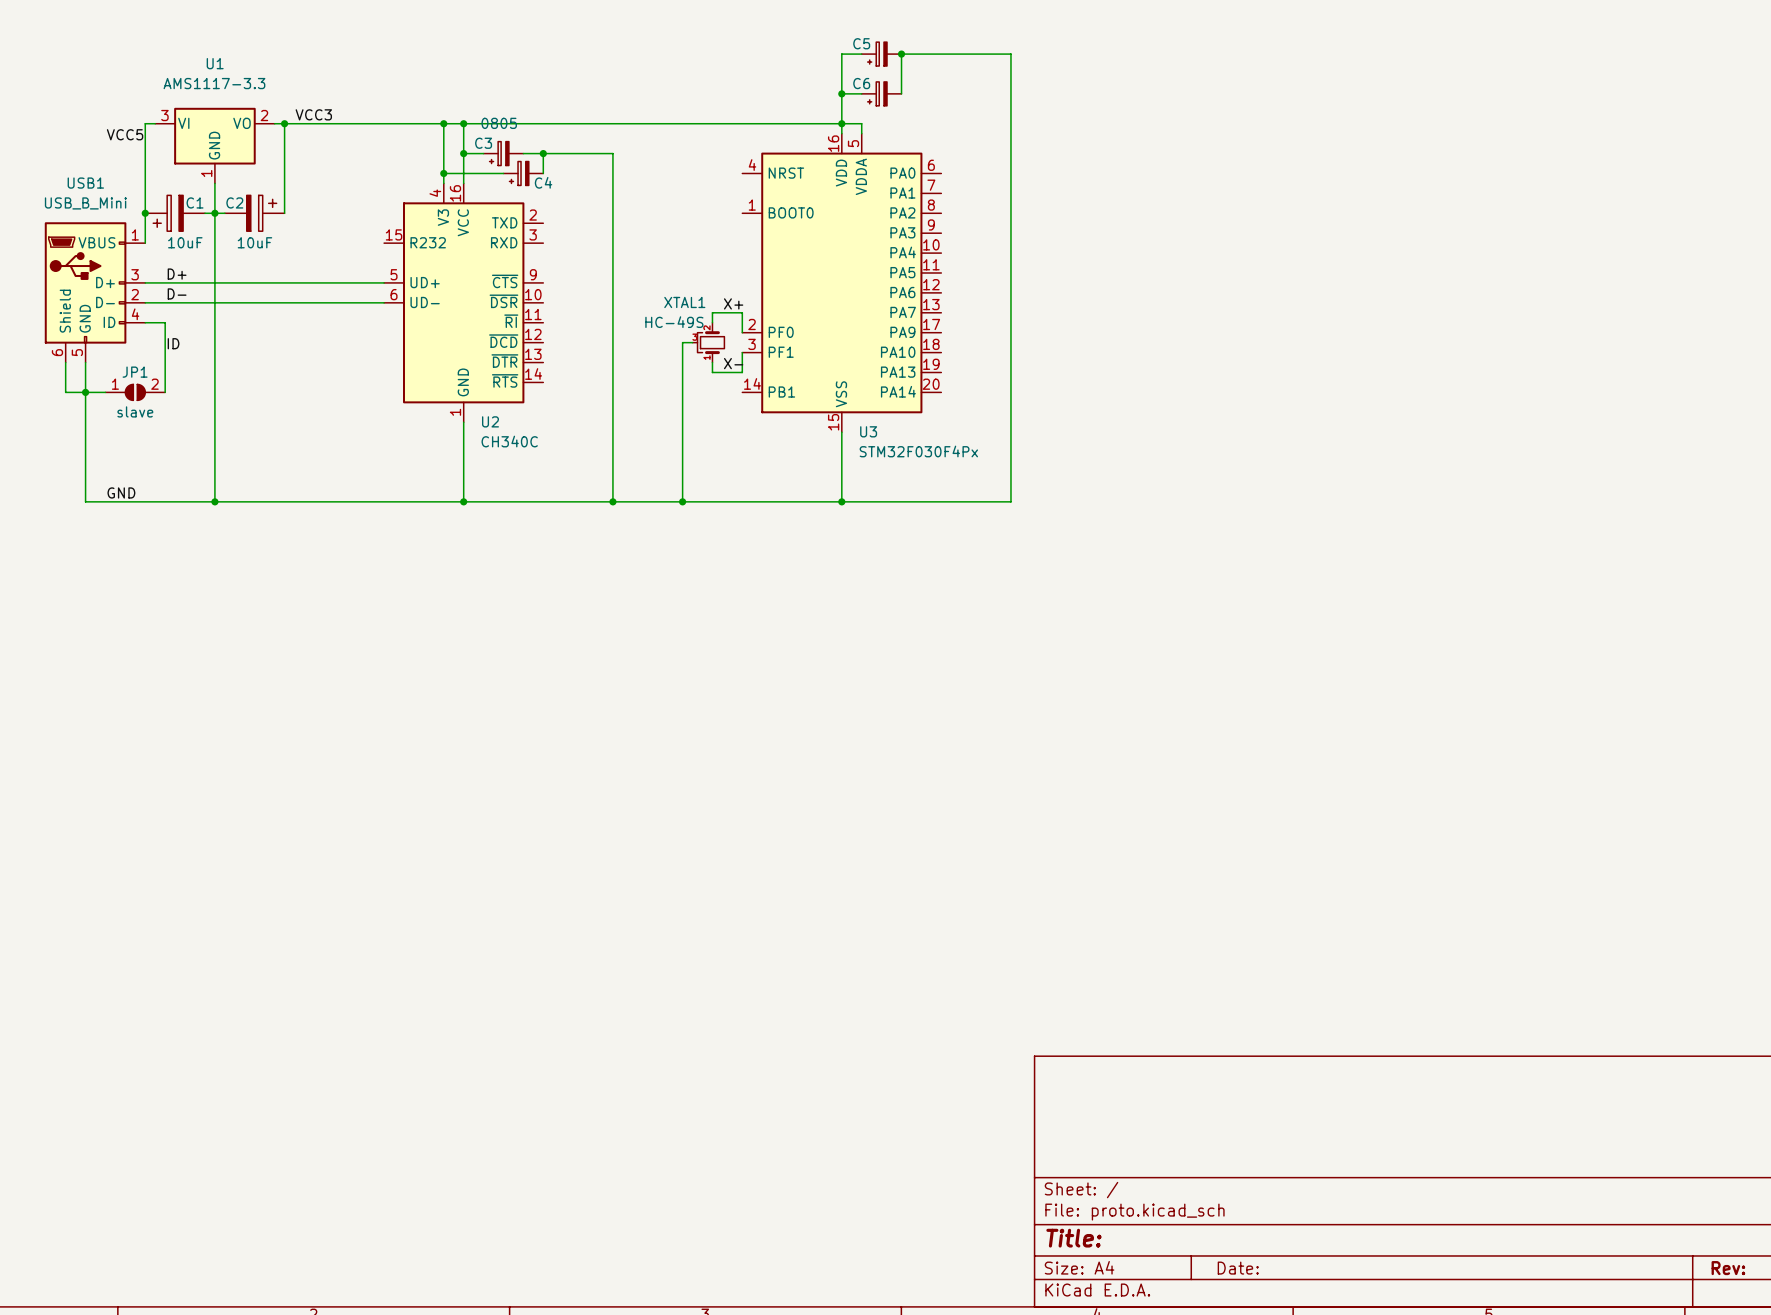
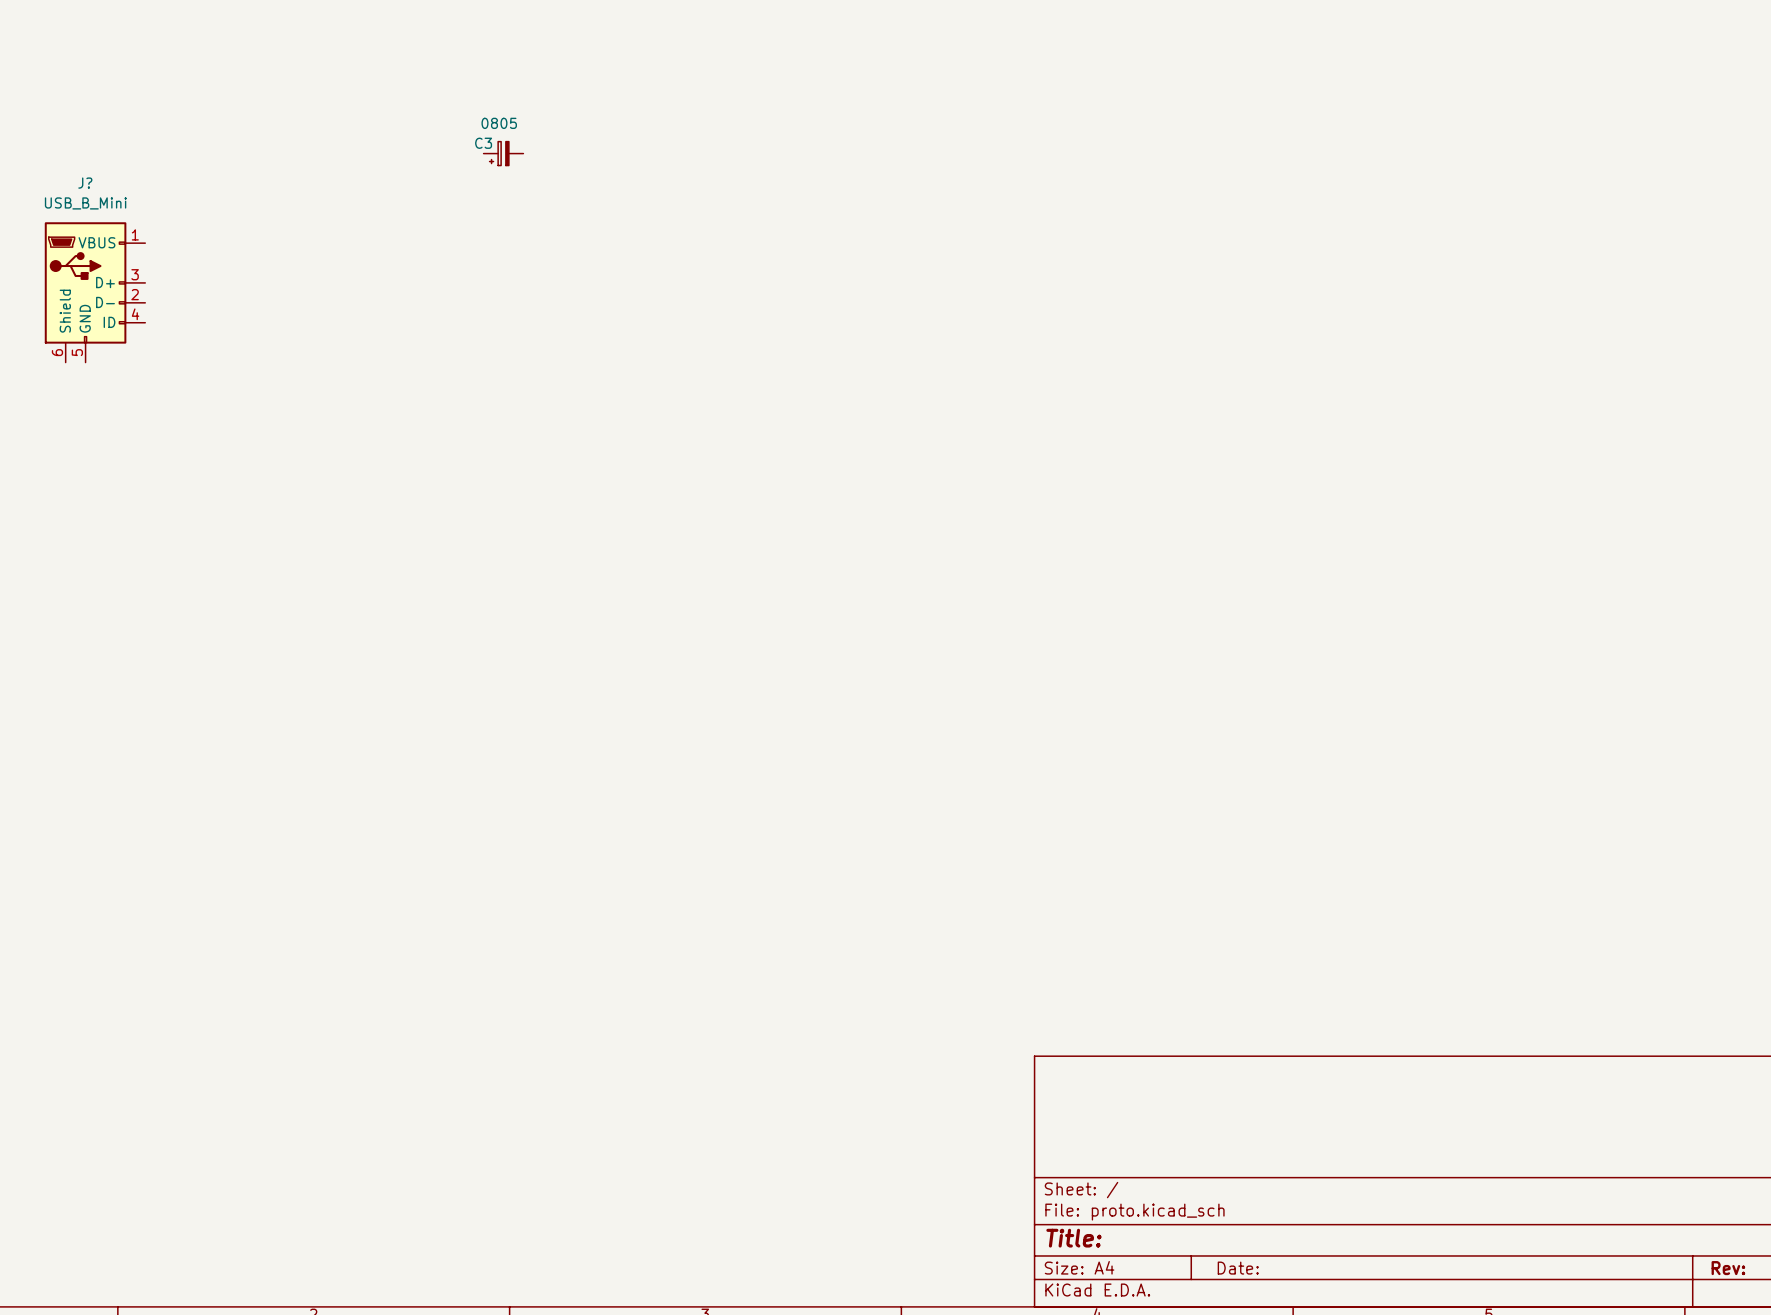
wire: (861, 54) (841, 54) (841, 133) -> none
C5: (881, 54) -> none
junction: (901, 54) -> none
wire: (841, 93) (861, 93) -> none
junction: (841, 93) -> none
C6: (881, 93) -> none
wire: (901, 93) (901, 54) (1010, 54) (1010, 501) (85, 501) (85, 362) -> none
label: VCC3 (313, 114) -> none
wire: (155, 123) (145, 123) (145, 243) -> none
wire: (274, 123) (861, 123) (861, 133) -> none
wire: (284, 123) (284, 213) -> none
junction: (284, 123) -> none
wire: (443, 123) (443, 183) -> none
junction: (443, 123) -> none
wire: (463, 123) (463, 183) -> none
junction: (463, 123) -> none
junction: (841, 123) -> none
label: VCC5 (125, 134) -> none
U1: AMS1117-3.3 (214, 145) -> none
wire: (463, 153) (483, 153) -> none
junction: (463, 153) -> none
wire: (523, 153) (612, 153) (612, 501) -> none
wire: (543, 153) (543, 173) -> none
junction: (543, 153) -> none
wire: (443, 173) (503, 173) -> none
junction: (443, 173) -> none
C4: (523, 173) -> none
USB1 name: USB1 (85, 183) -> J? (85, 183)
wire: (214, 183) (214, 501) -> none
junction: (145, 213) -> none
C1: 10uF (175, 213) -> none
wire: (204, 213) (224, 213) -> none
junction: (214, 213) -> none
C2: 10uF (254, 213) -> none
label: D+ (177, 274) -> none
wire: (145, 282) (384, 282) -> none
U3: STM32F030F4Px (841, 282) -> none
label: D- (177, 293) -> none
wire: (145, 302) (384, 302) -> none
U2: CH340C (463, 302) -> none
label: X+ (733, 303) -> none
wire: (145, 322) (165, 322) (165, 392) -> none
wire: (712, 322) (712, 312) (742, 312) (742, 332) -> none
wire: (692, 342) (682, 342) (682, 501) -> none
XTAL1: HC-49S (708, 342) -> none
label: ID (173, 343) -> none
wire: (742, 352) (742, 372) (712, 372) (712, 362) -> none
wire: (65, 362) (65, 392) (105, 392) -> none
label: X- (733, 363) -> none
junction: (85, 392) -> none
JP1: slave (135, 392) -> none
wire: (463, 422) (463, 501) -> none
wire: (841, 432) (841, 501) -> none
label: GND (121, 492) -> none
junction: (214, 501) -> none
junction: (463, 501) -> none
junction: (612, 501) -> none
junction: (682, 501) -> none
junction: (841, 501) -> none

